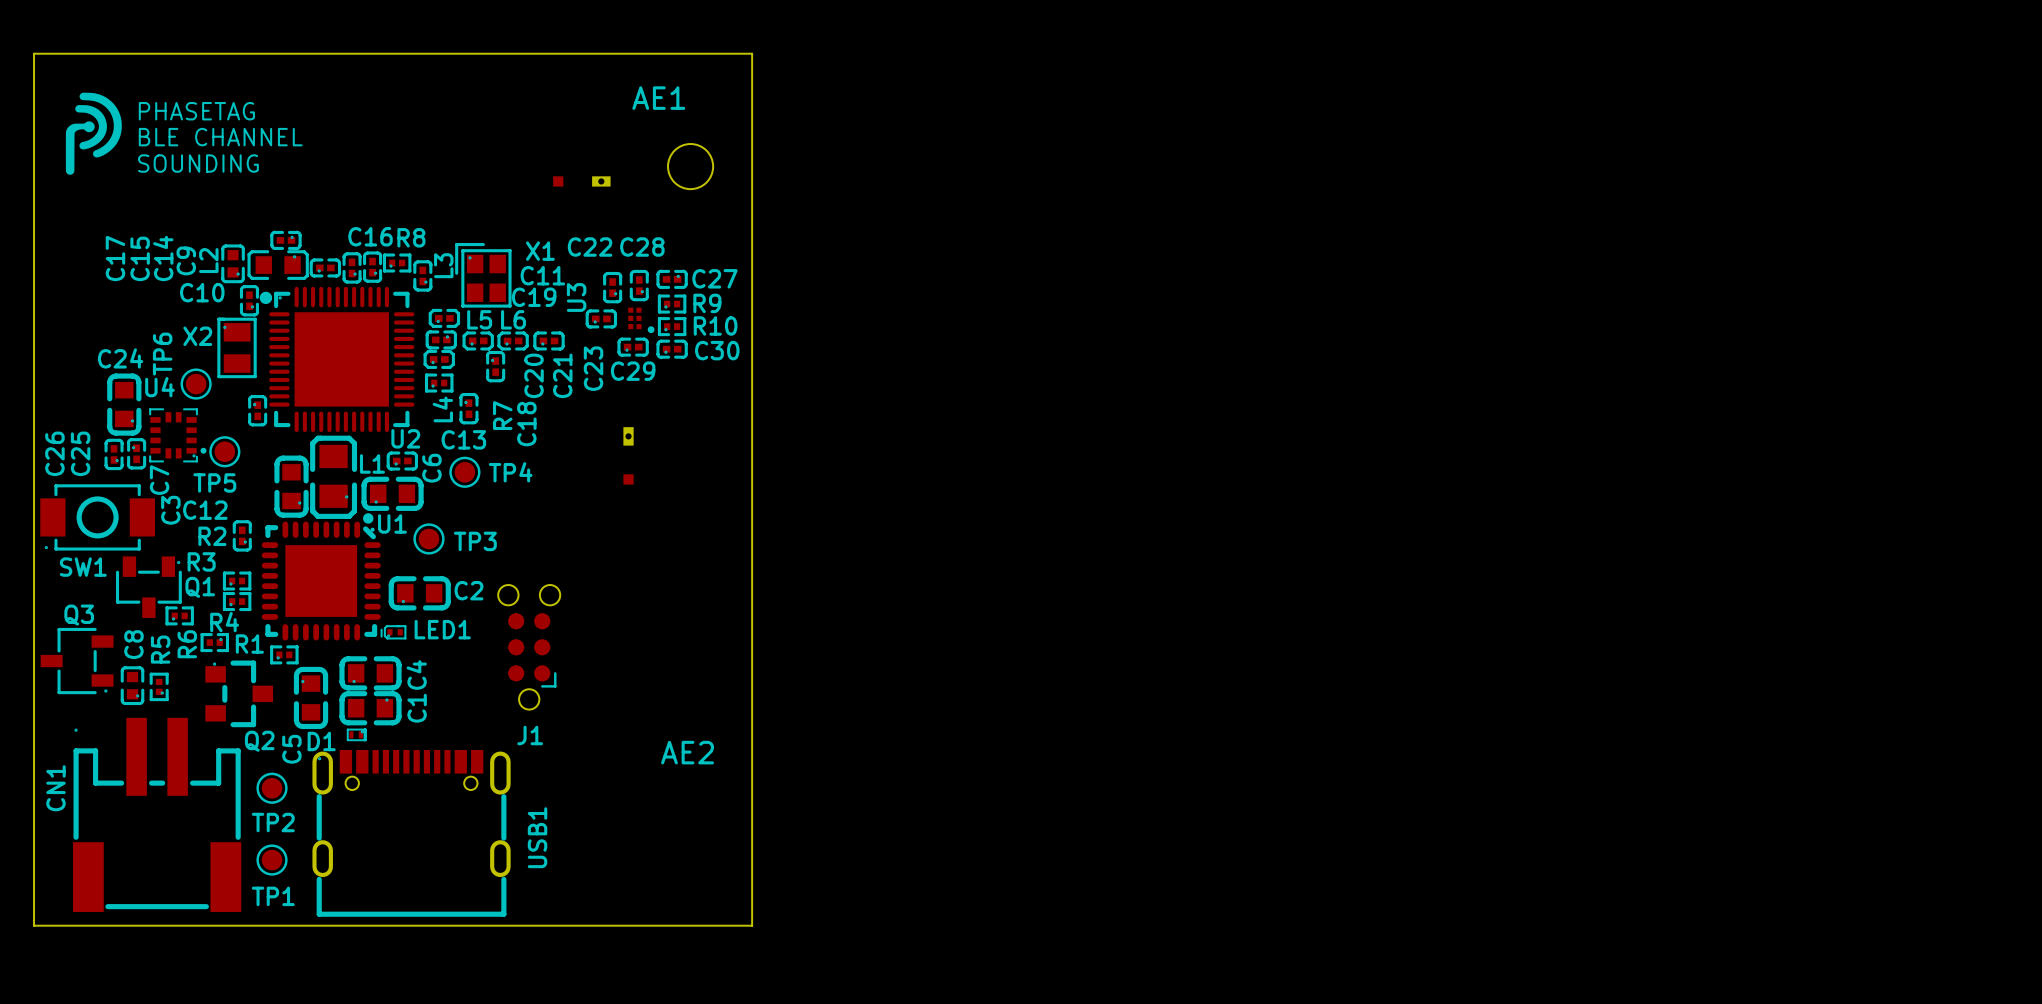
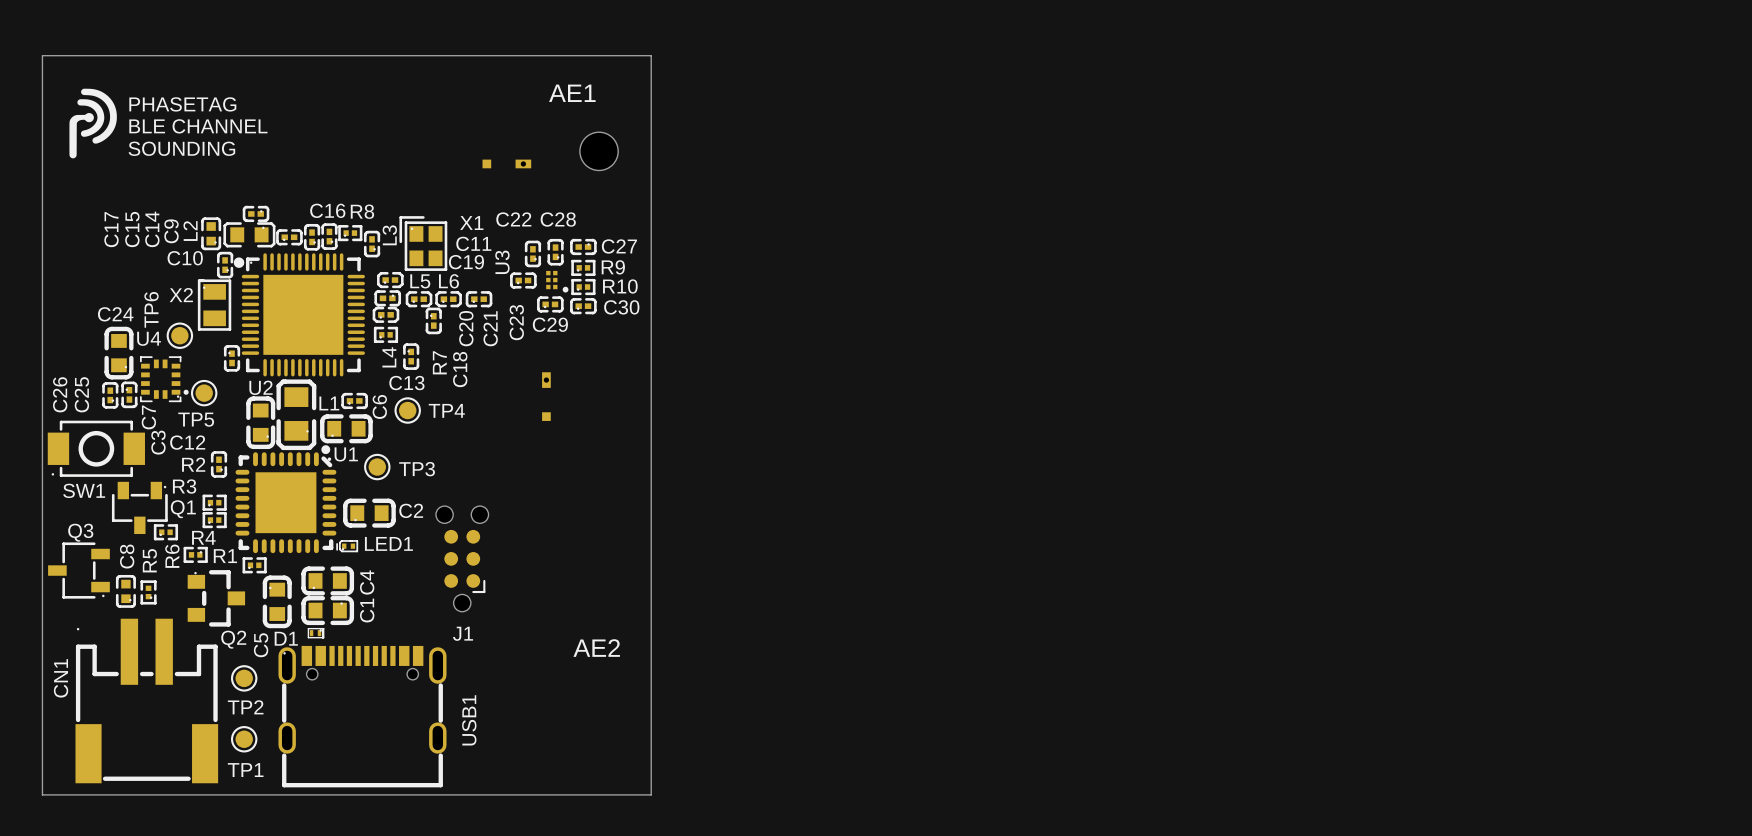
U2 name position: U2 (405, 438) -> U2 (261, 387)

